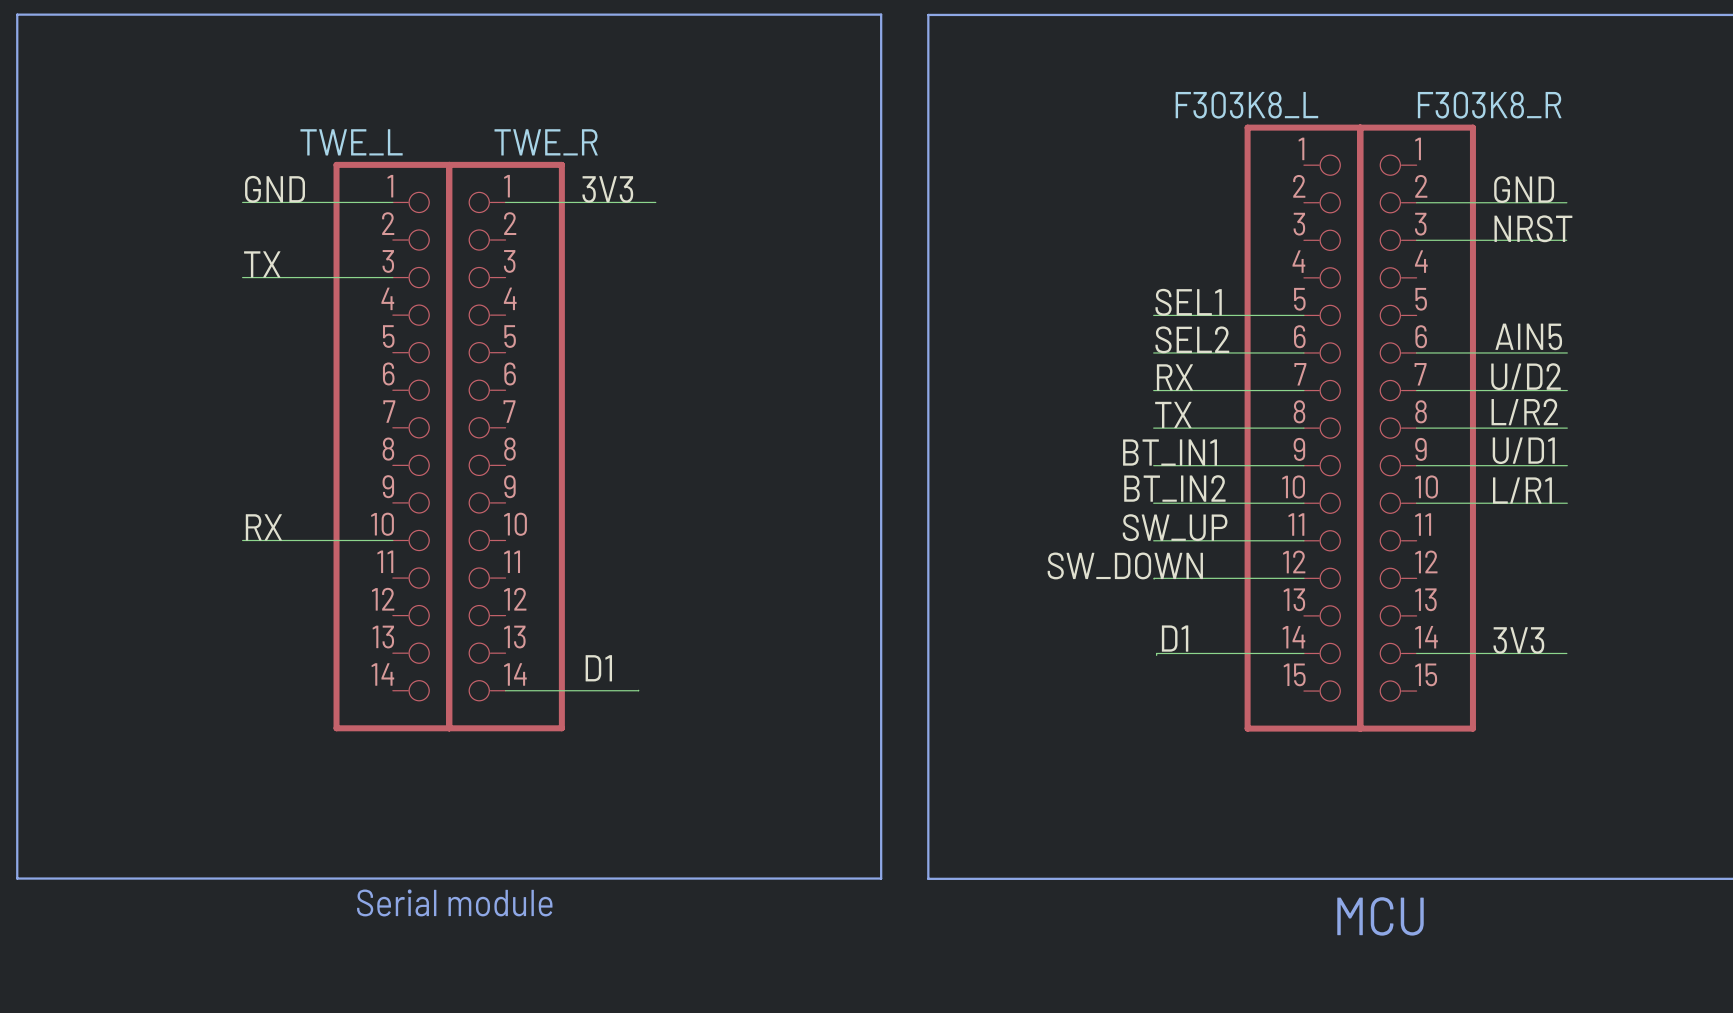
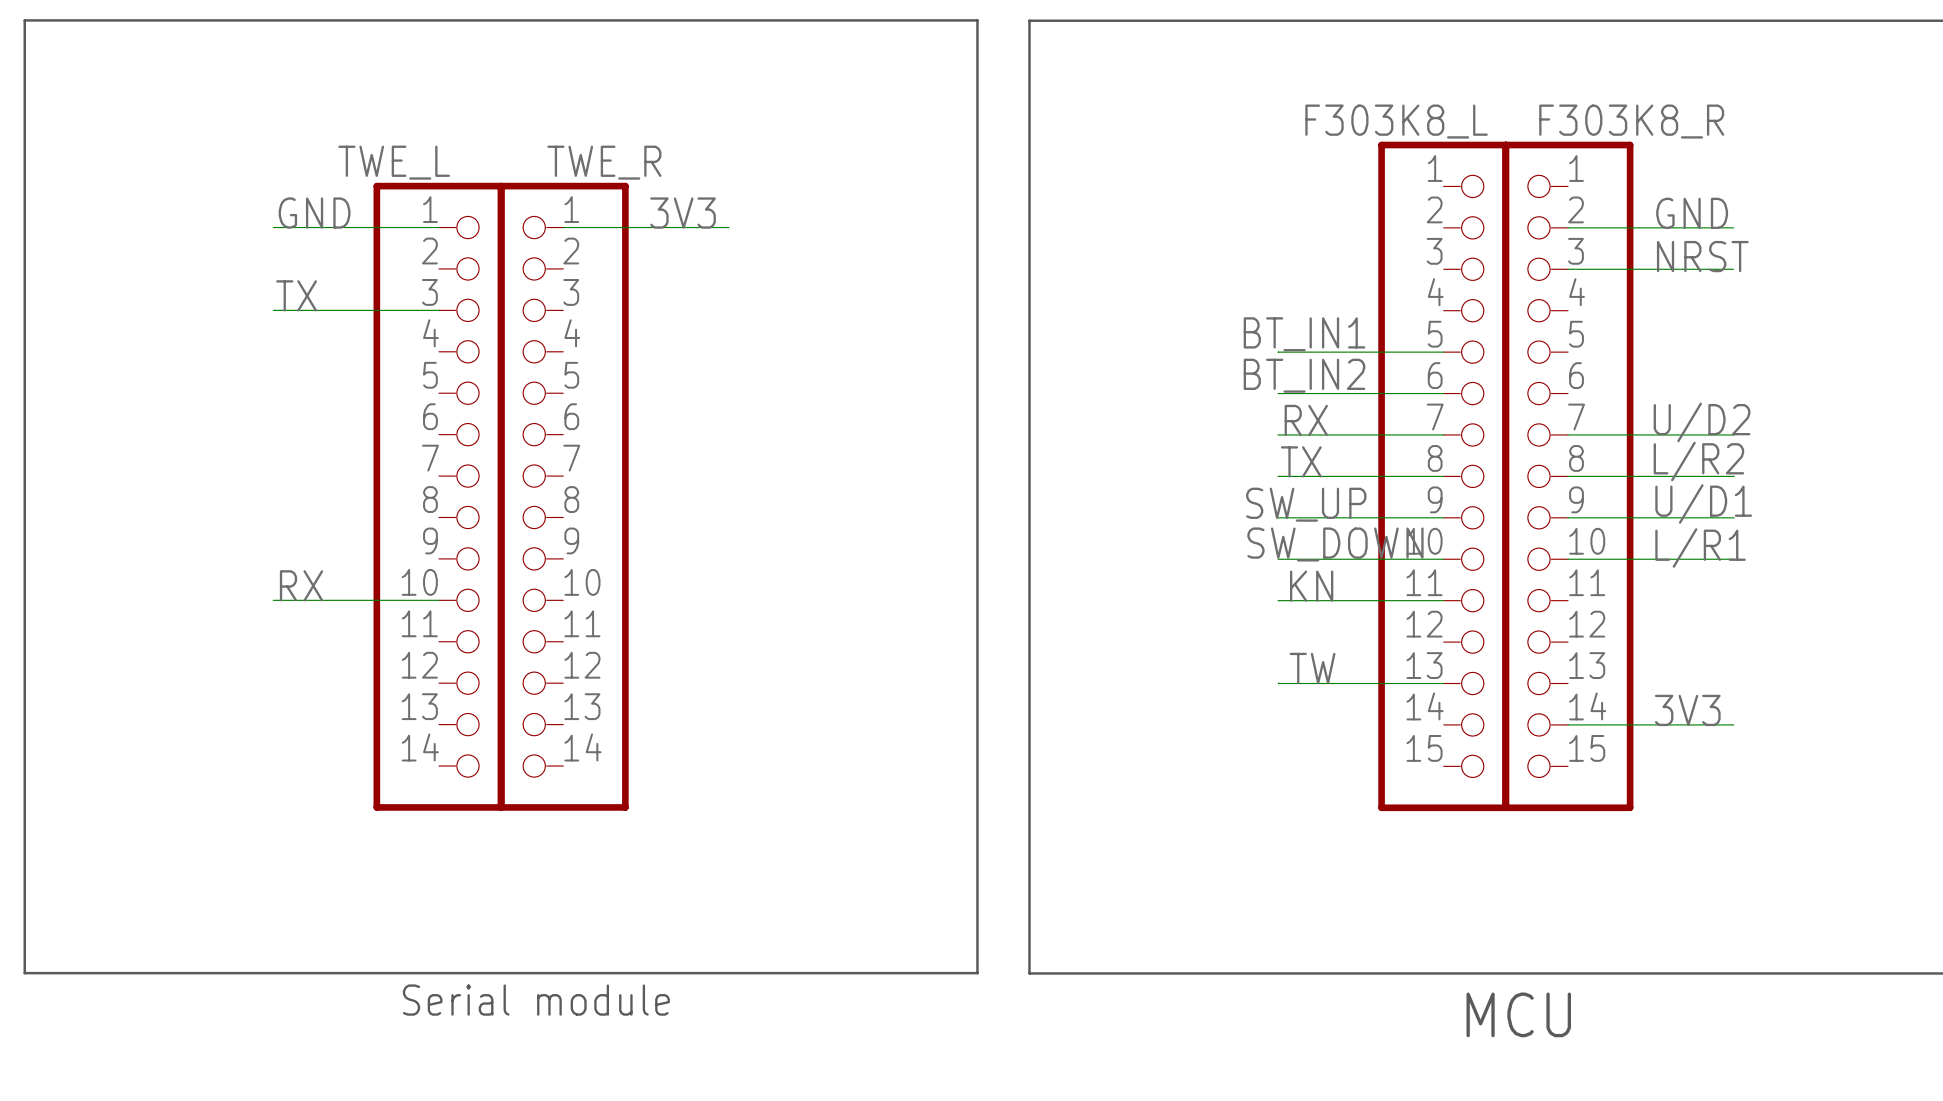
label: none -> BT_IN1 (1304, 334)
label: SEL1 (1188, 302) -> none
label: none -> BT_IN2 (1304, 375)
label: AIN5 (1528, 336) -> none
label: SEL2 (1192, 339) -> none
wire: (1416, 352) (1567, 352) -> none
label: BT_IN1 (1170, 452) -> SW_UP (1306, 504)
label: BT_IN2 (1174, 488) -> SW_DOWN (1335, 544)
label: SW_UP (1175, 527) -> none
label: none -> KN (1311, 586)
label: SW_DOWN (1125, 565) -> none
wire: (1303, 578) (1154, 579) -> none
label: none -> TW (1312, 668)
wire: none -> (1278, 682) (1443, 683)
label: D1 (1175, 638) -> none
wire: (1303, 653) (1156, 653) (1156, 655) -> none
label: D1 (598, 668) -> none
wire: (638, 690) (505, 690) -> none

